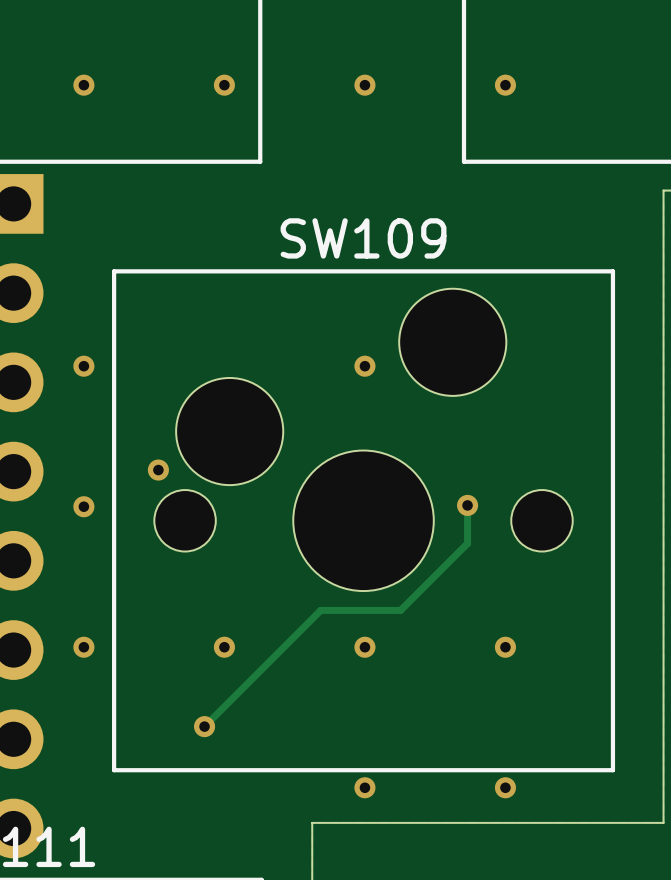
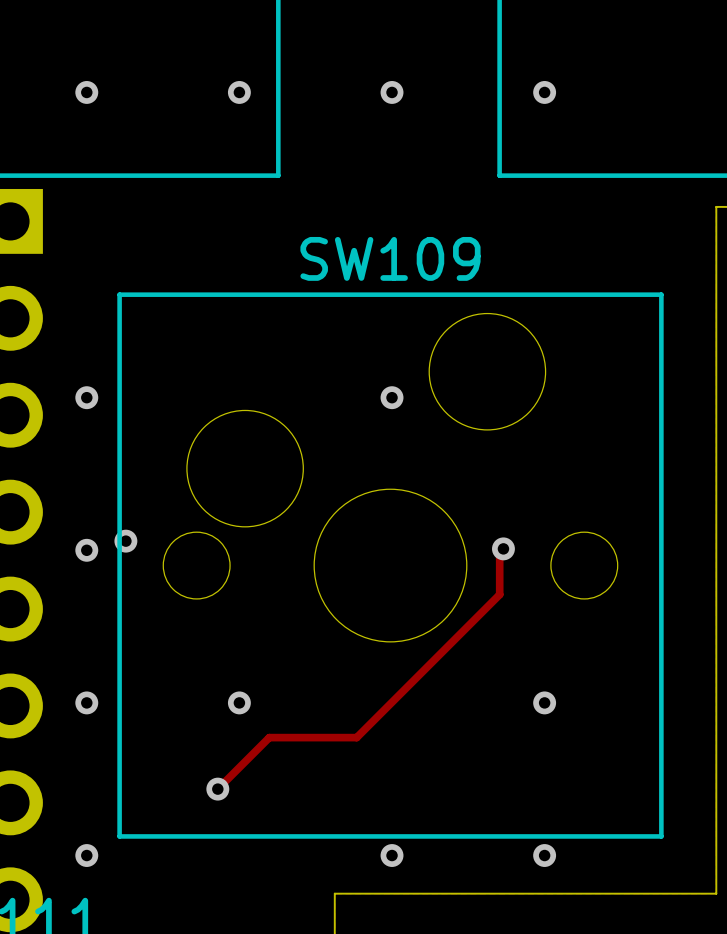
via position: (158, 470) -> (125, 541)
track: (467, 505) (467, 543) (400, 610) (320, 610) (251, 679) -> (499, 552) (499, 594) (356, 737) (269, 737)
via: (364, 647) -> none
via: none -> (86, 855)

